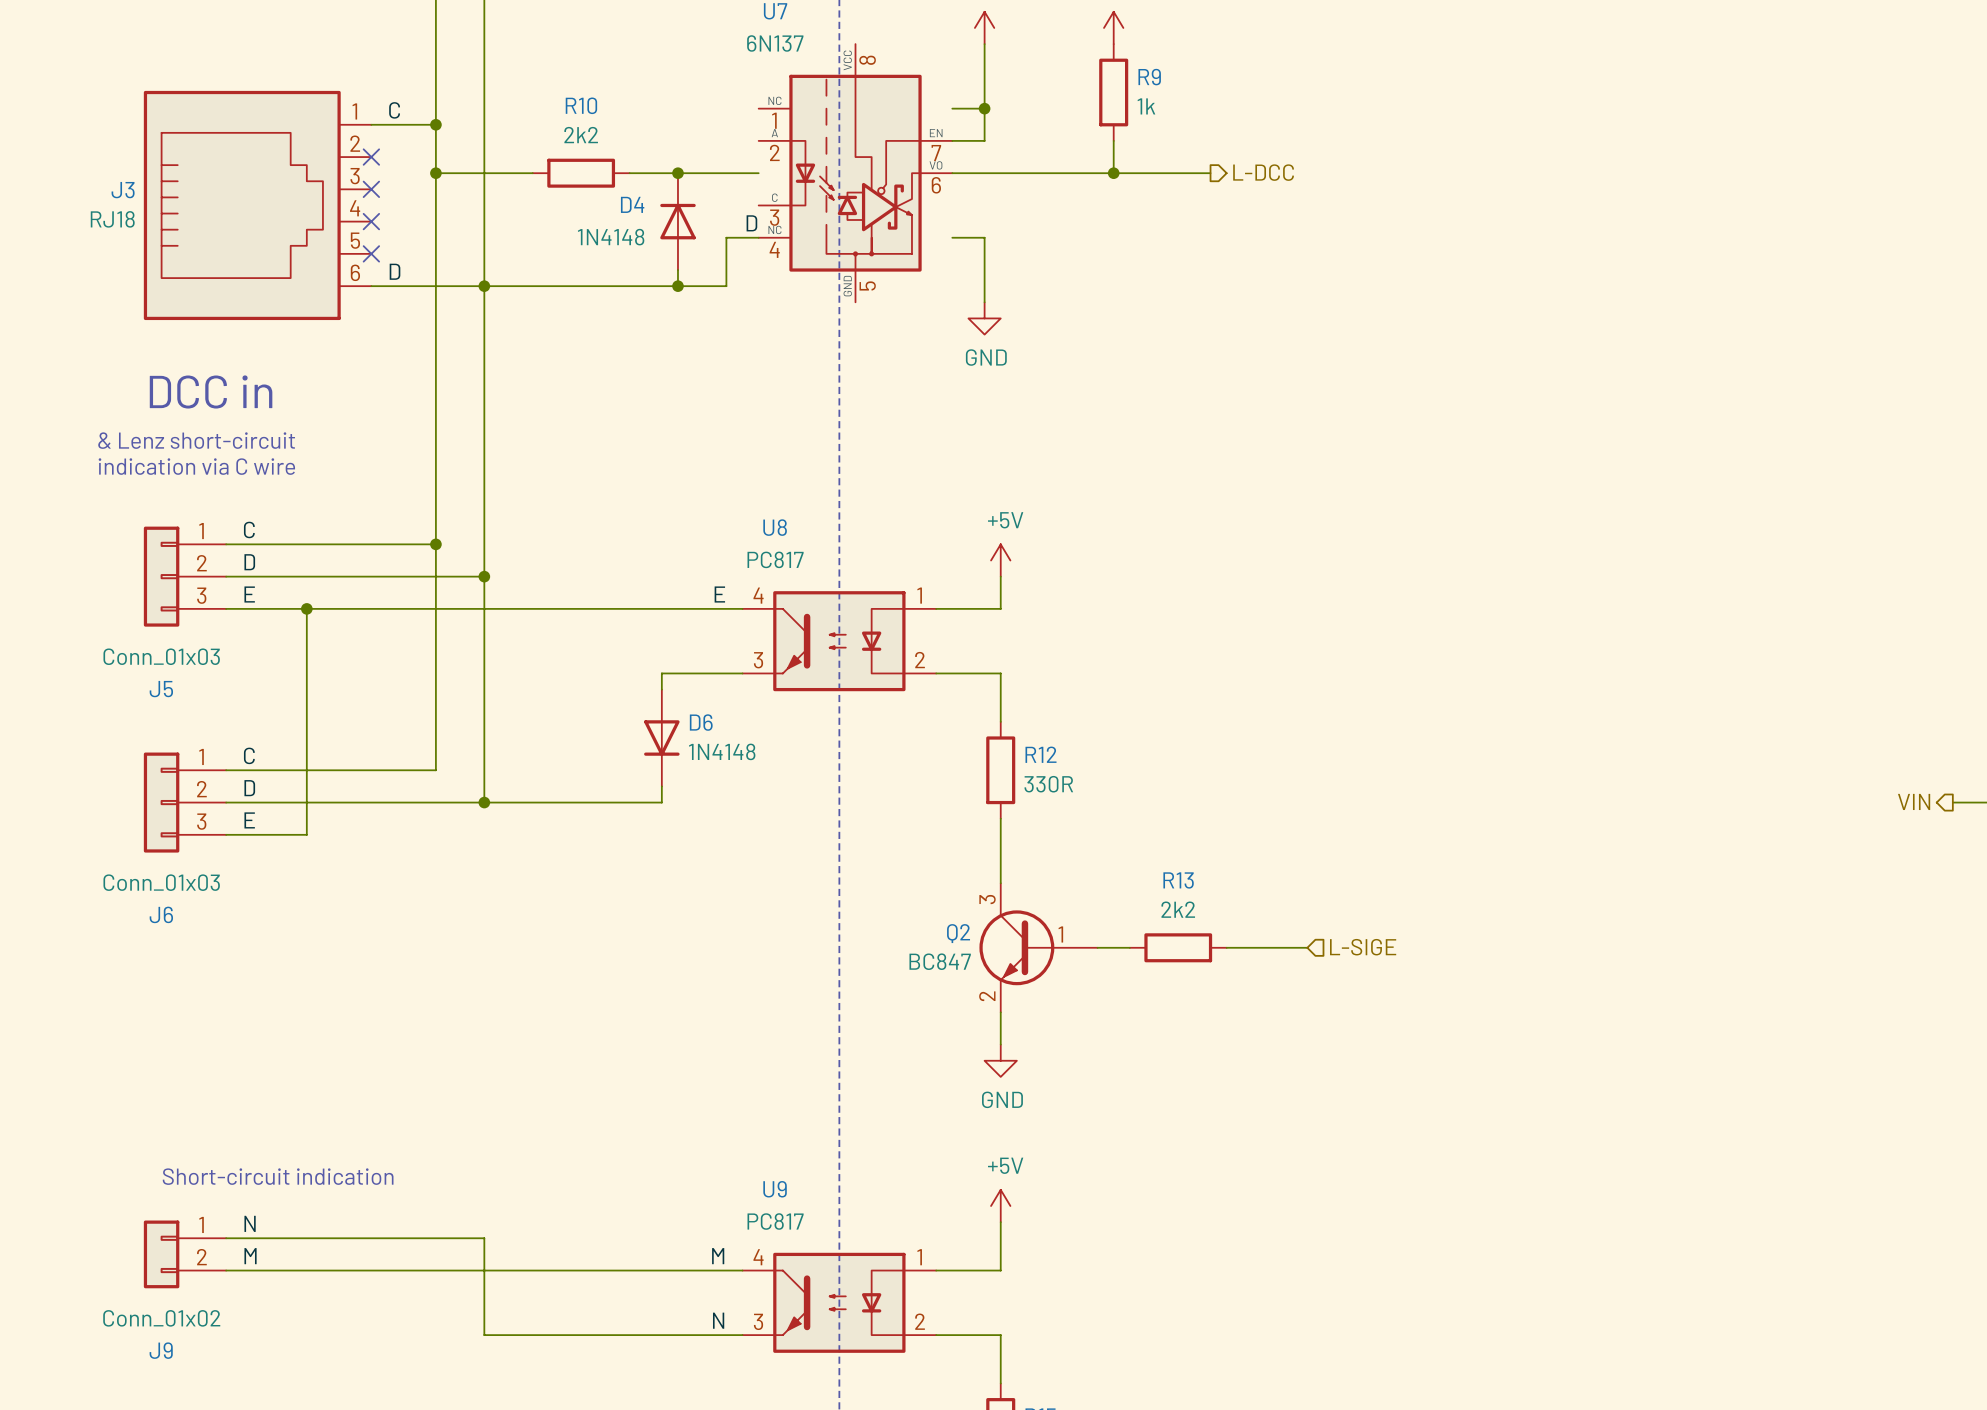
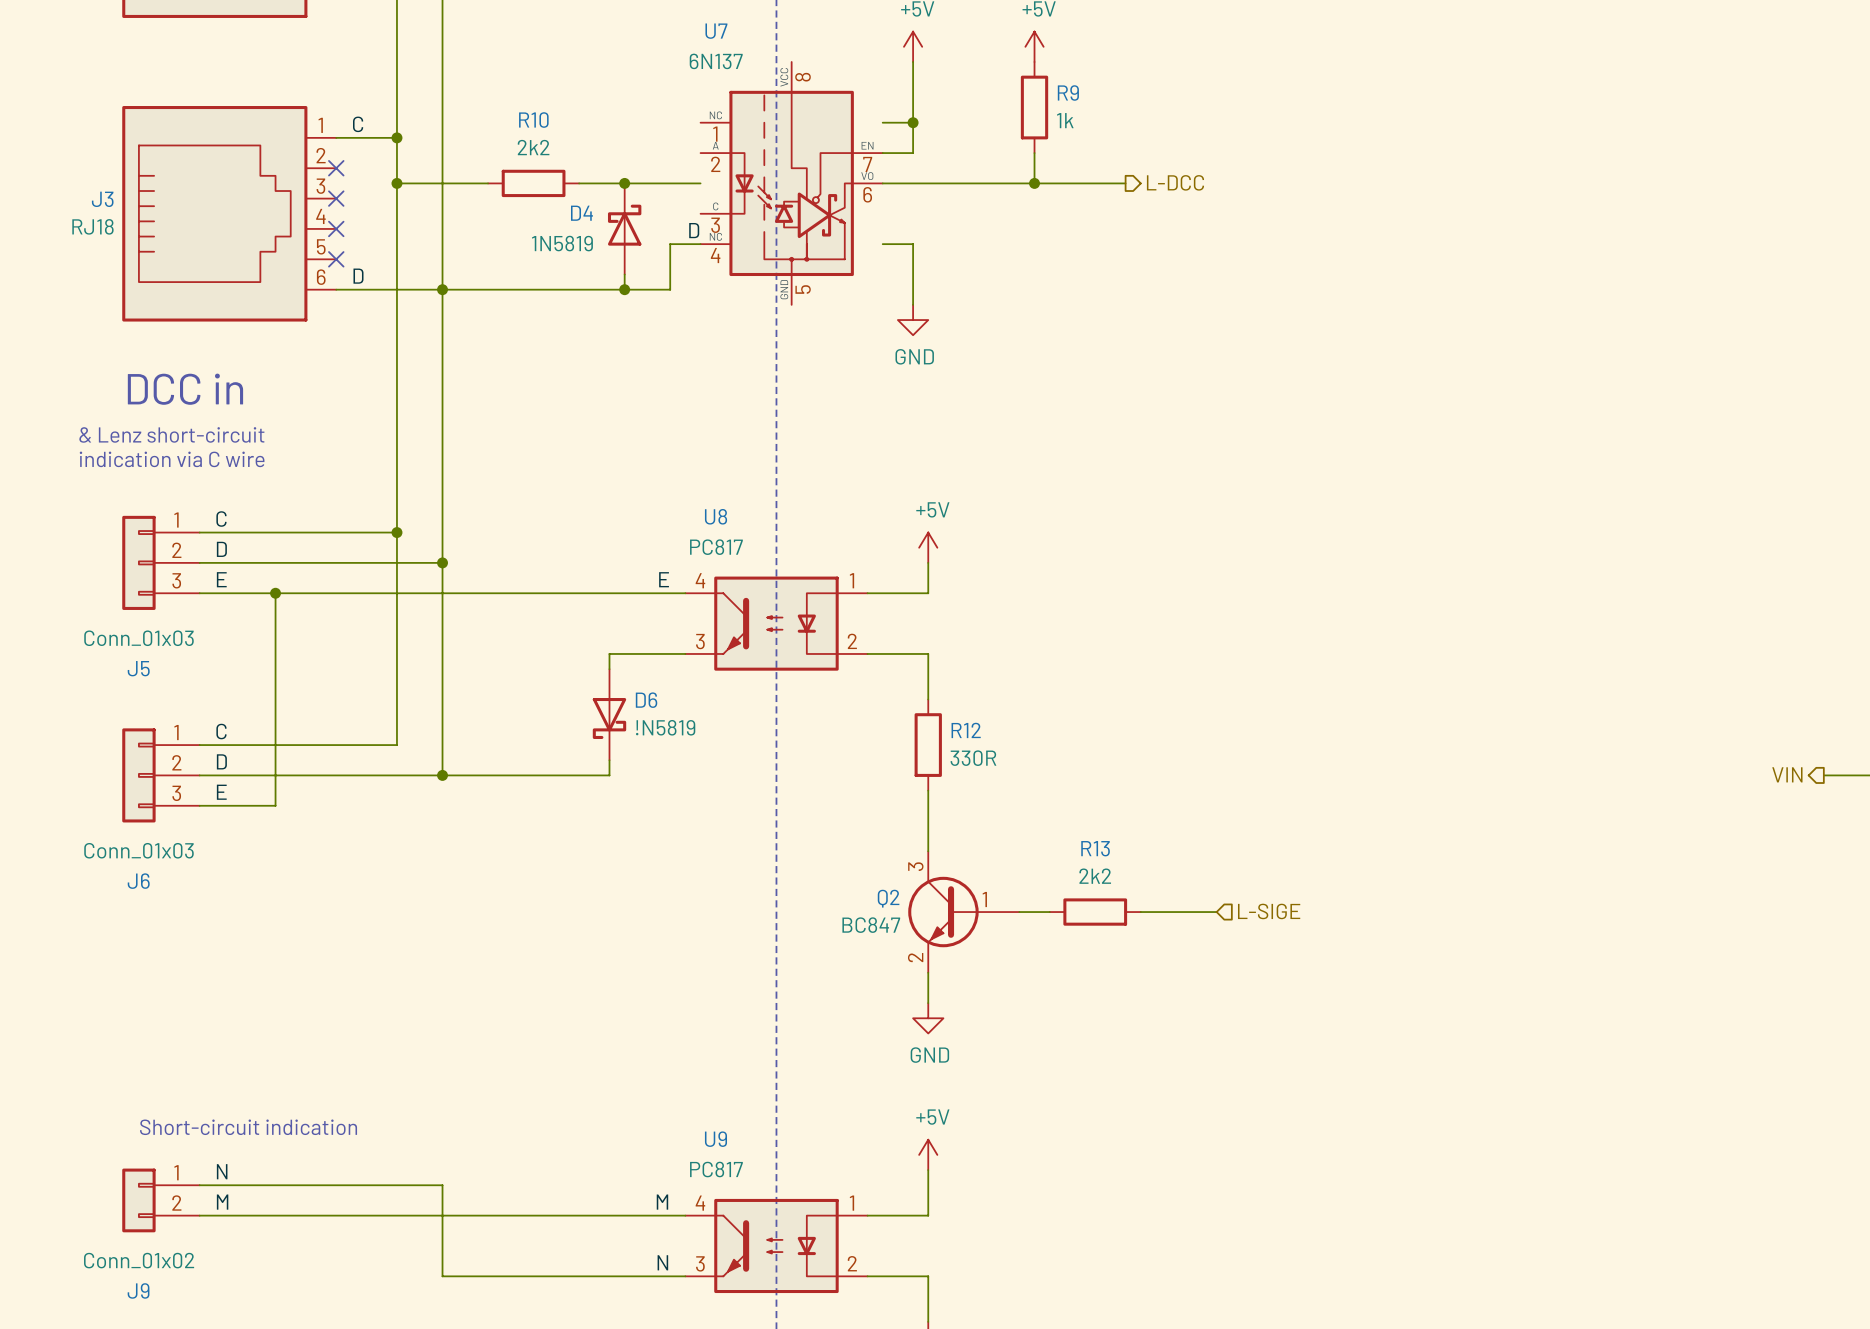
D4 symbol: [660, 173, 696, 271] -> [607, 183, 642, 275]
D4 value: 1N4148 (611, 237) -> 1N5819 (562, 243)
D6 symbol: [644, 689, 680, 787] -> [592, 669, 627, 761]
D6 value: 1N4148 (722, 751) -> !N5819 (665, 727)

